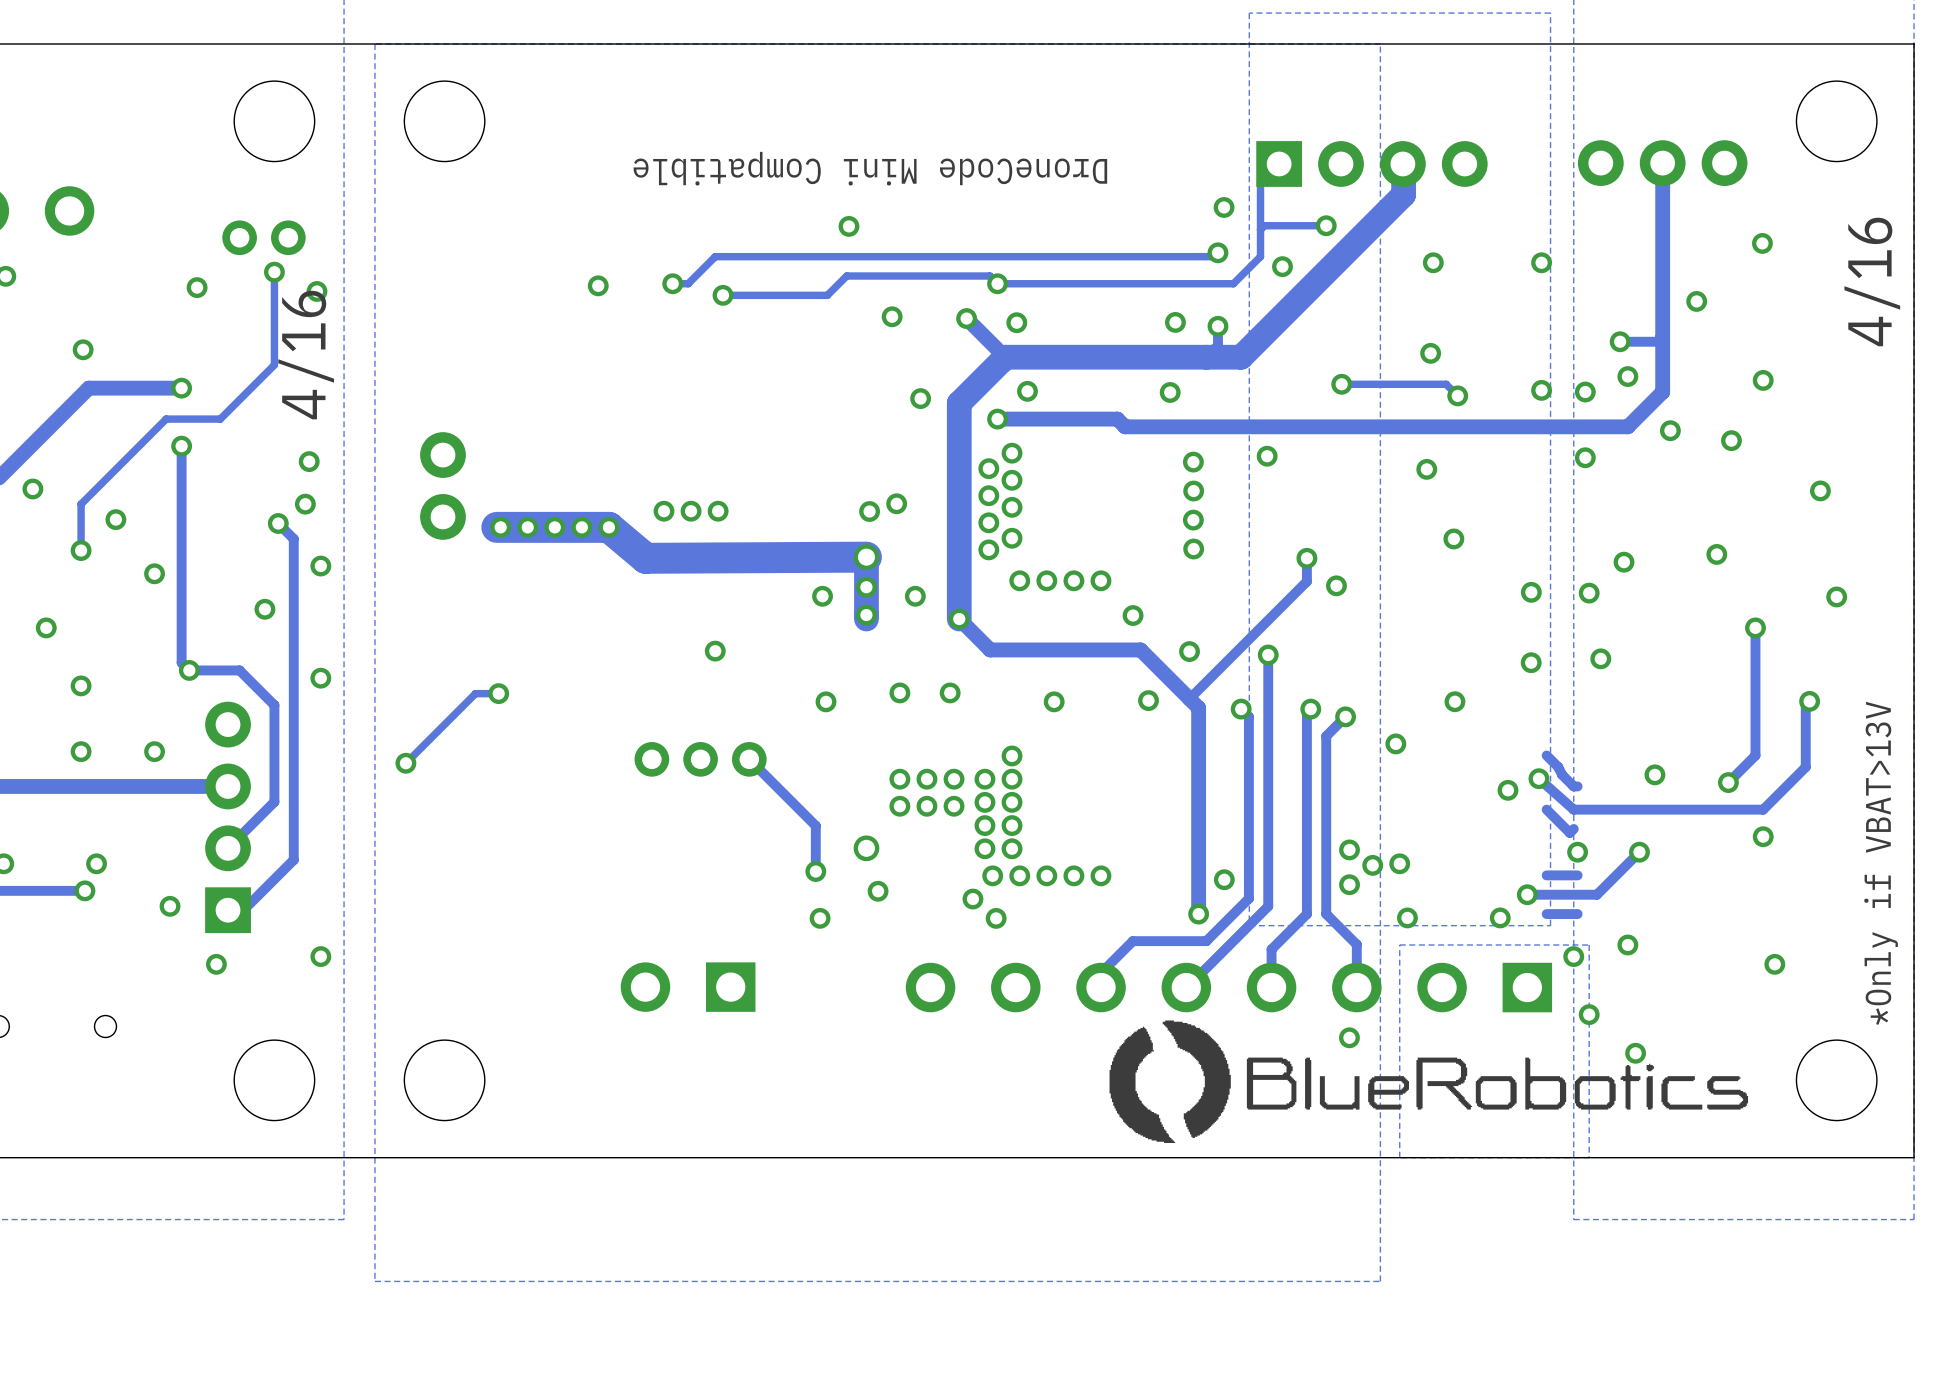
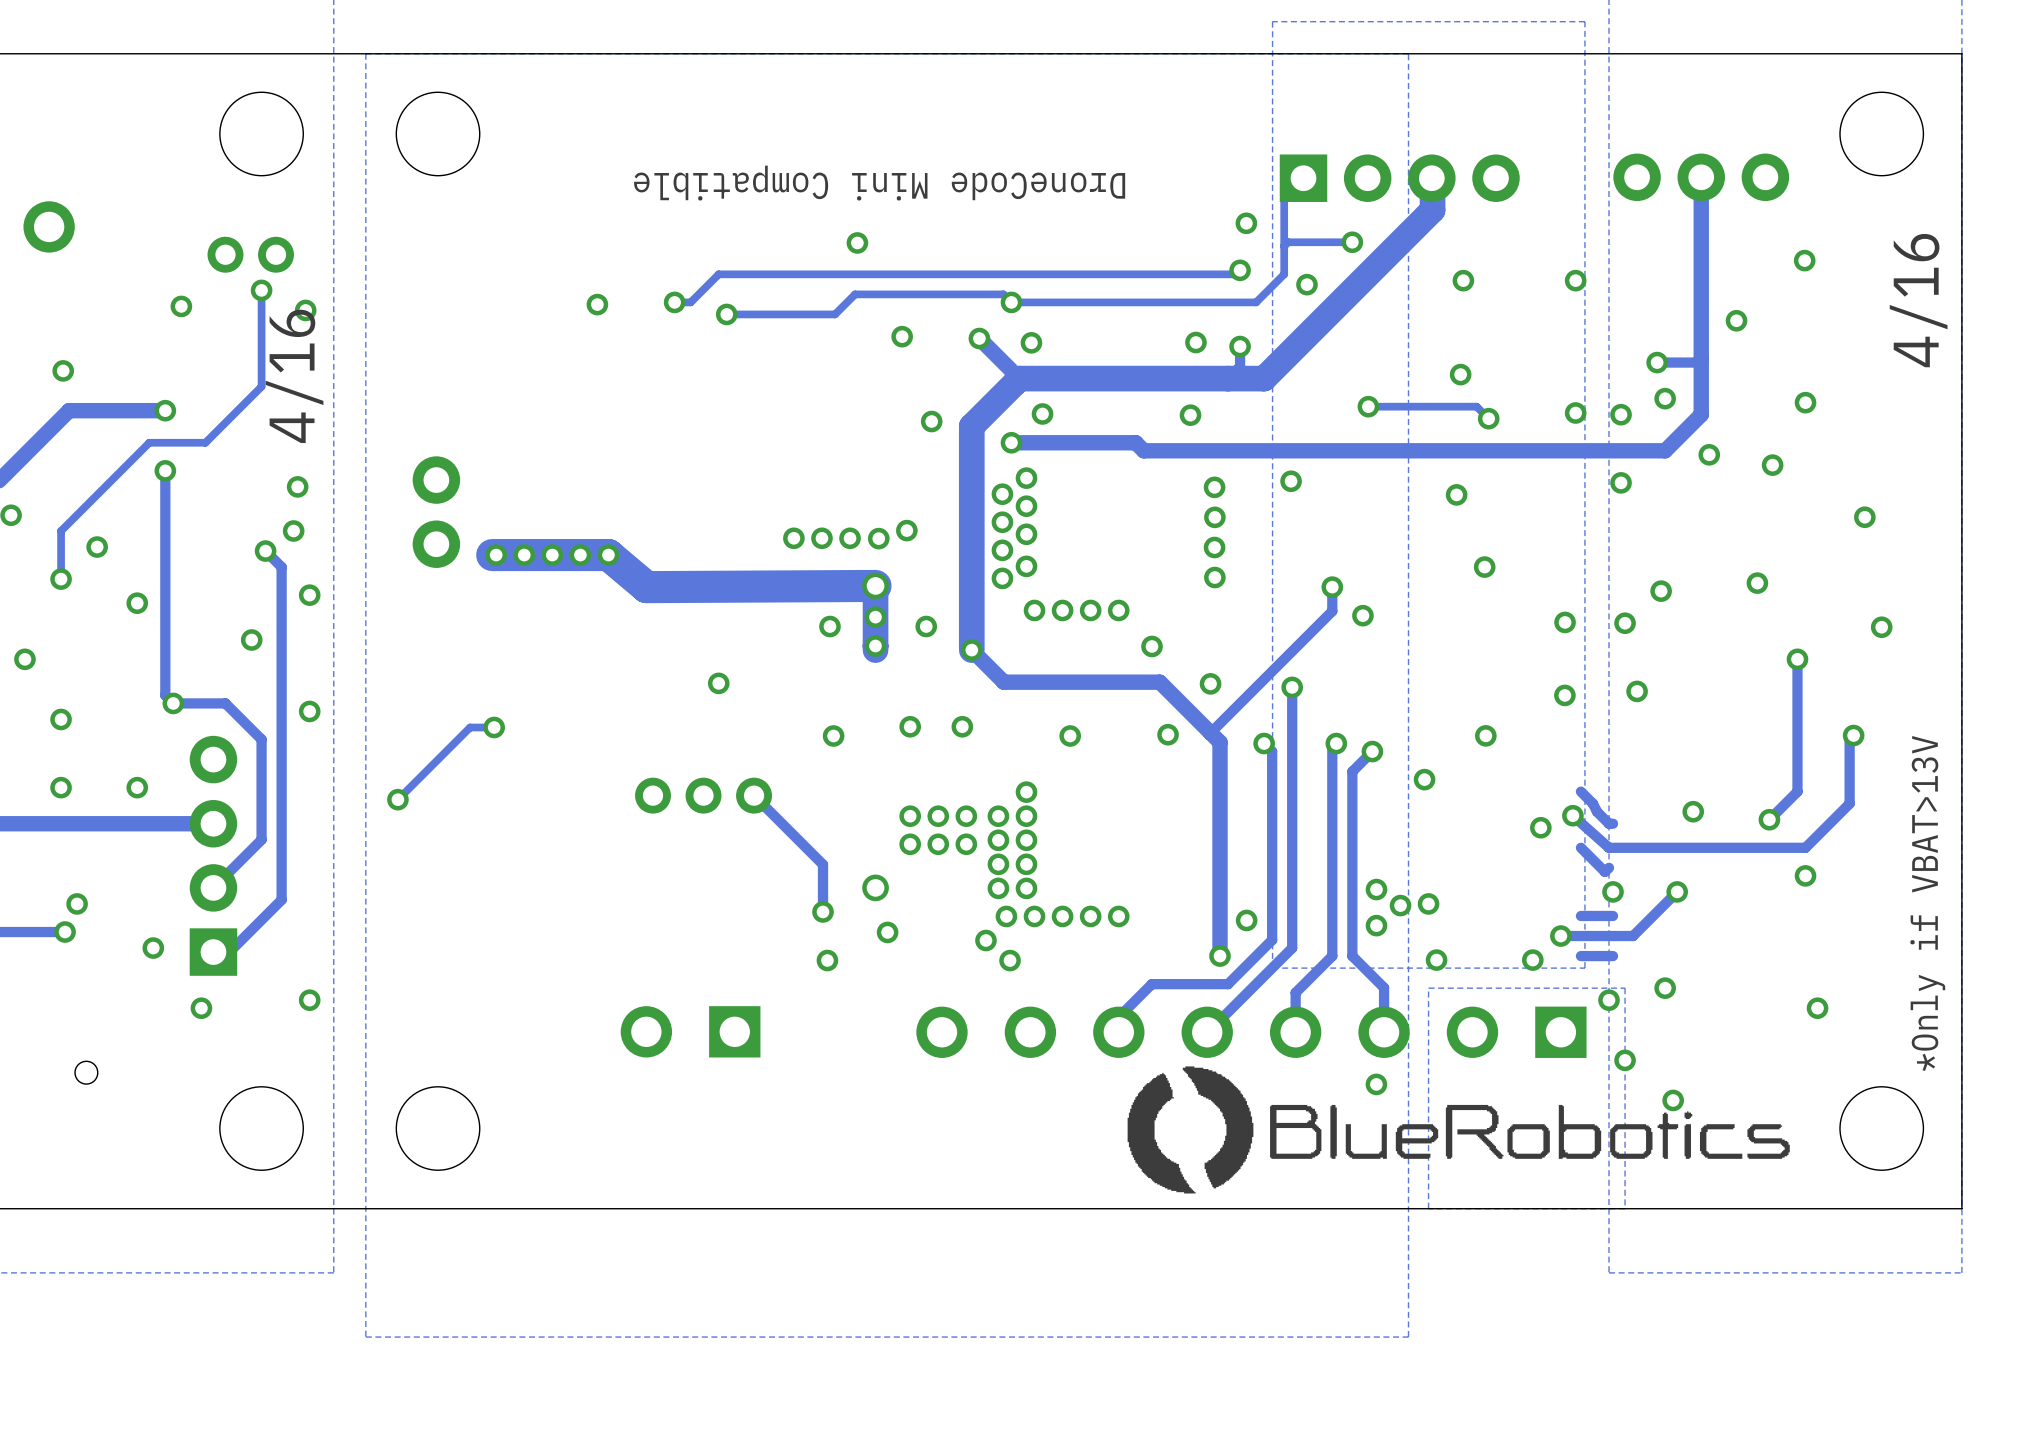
via: (664, 511) -> none
via: (691, 511) -> none
via: (718, 511) -> none
via: none -> (793, 538)
via: none -> (821, 538)
via: none -> (850, 538)

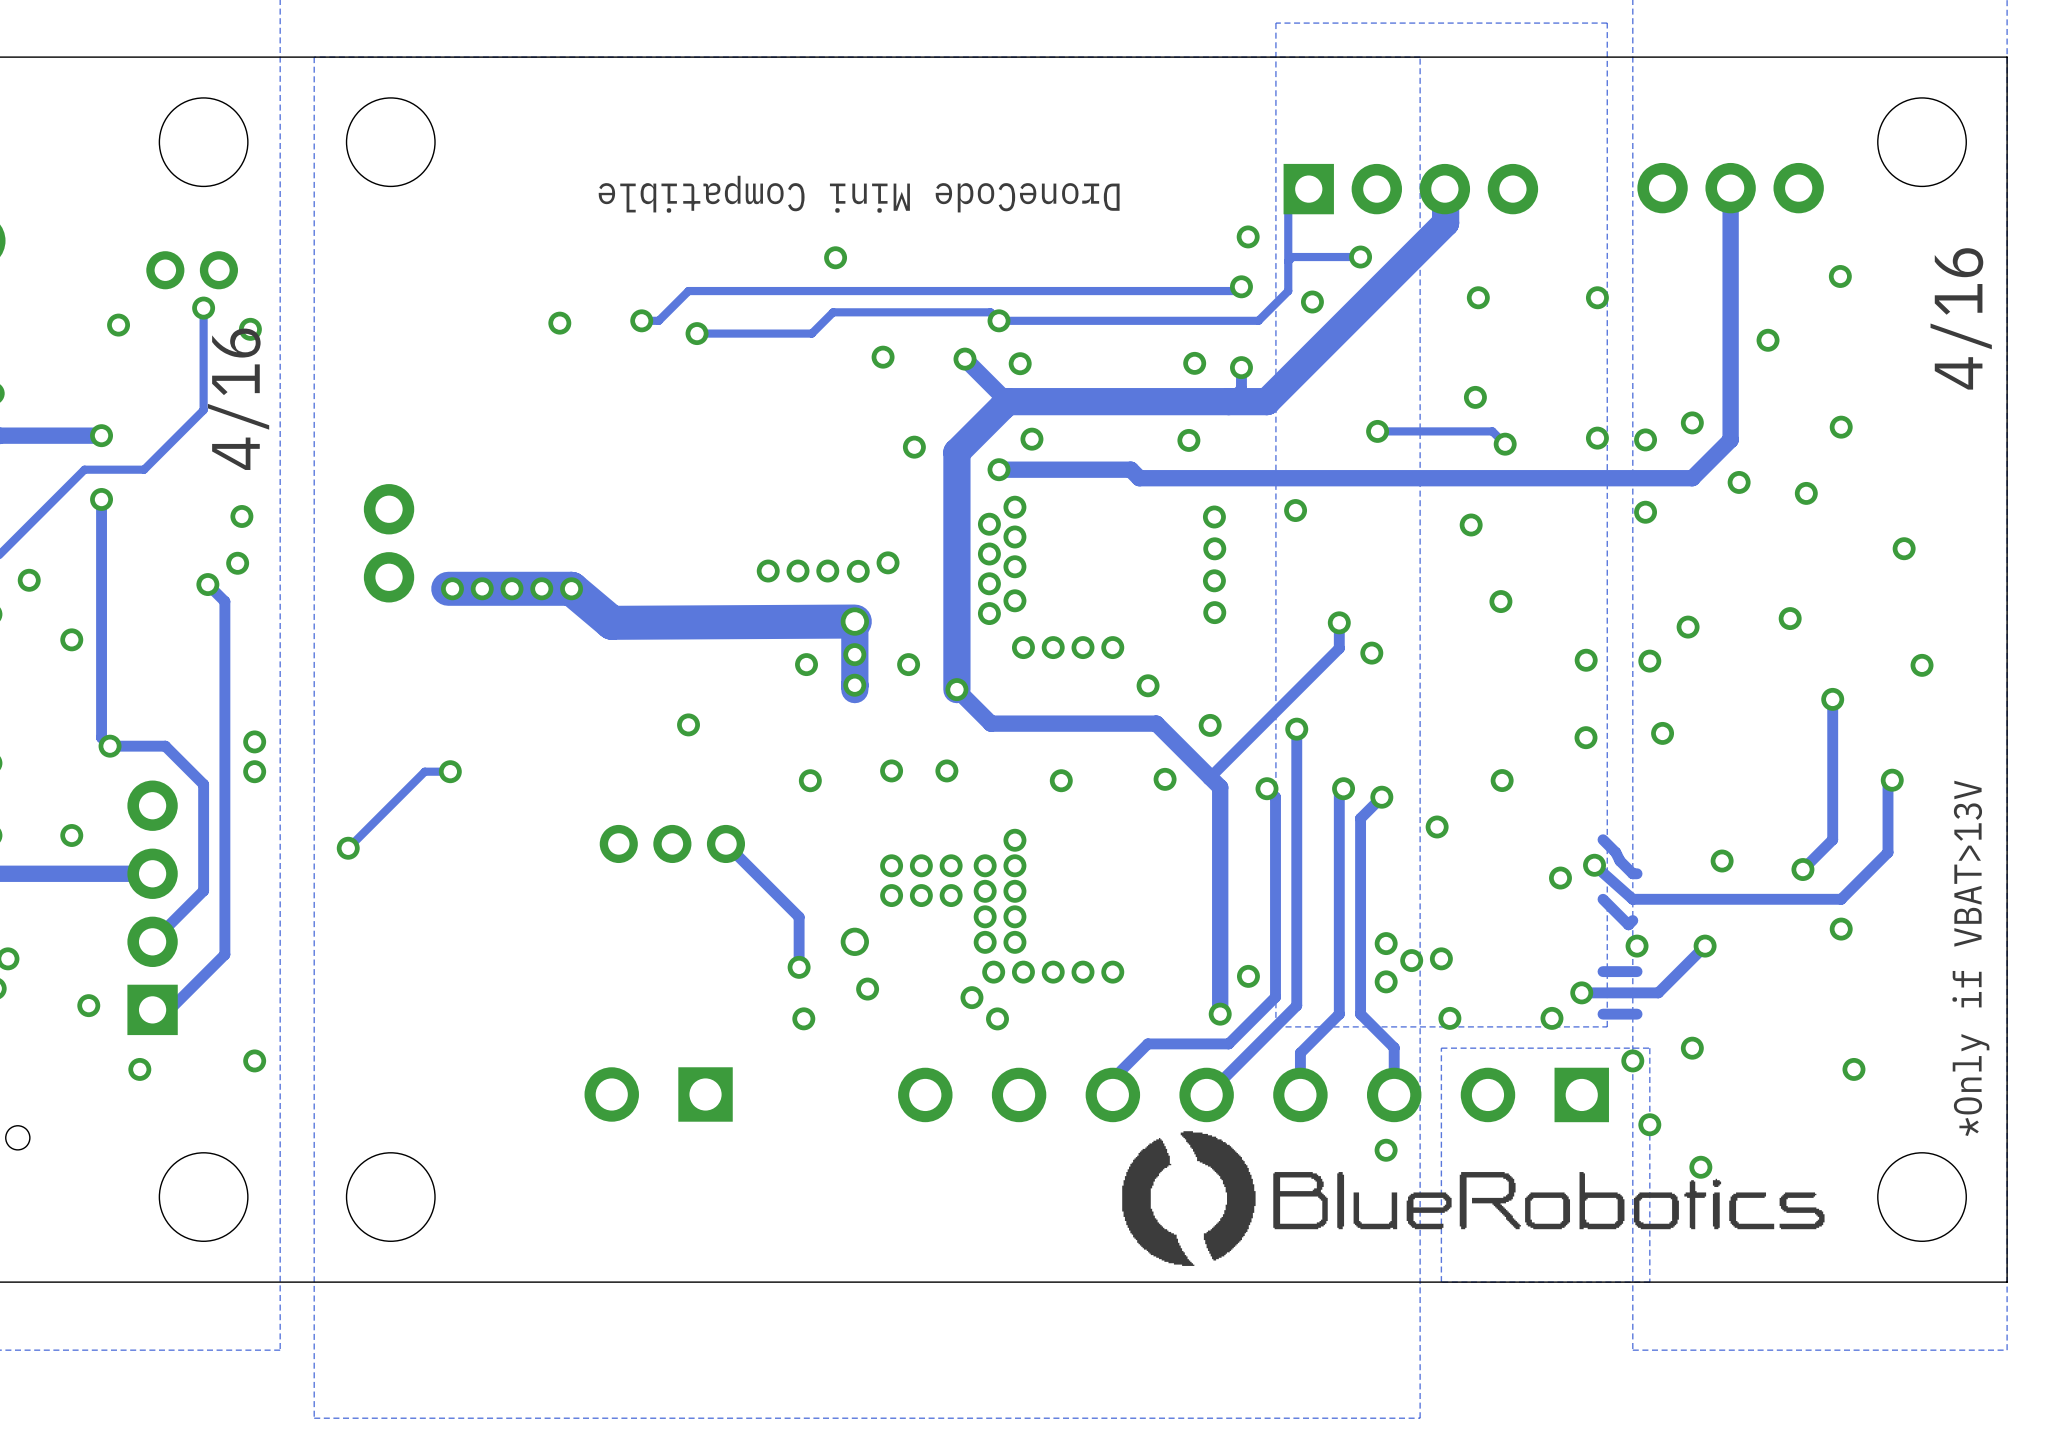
track: (1701, 358) (1697, 362) (1657, 362) -> none
via: (1657, 362) -> none
via: (309, 595) -> none
via: (251, 639) -> none
via: none -> (254, 741)
via: (309, 711) -> none
via: none -> (254, 771)

